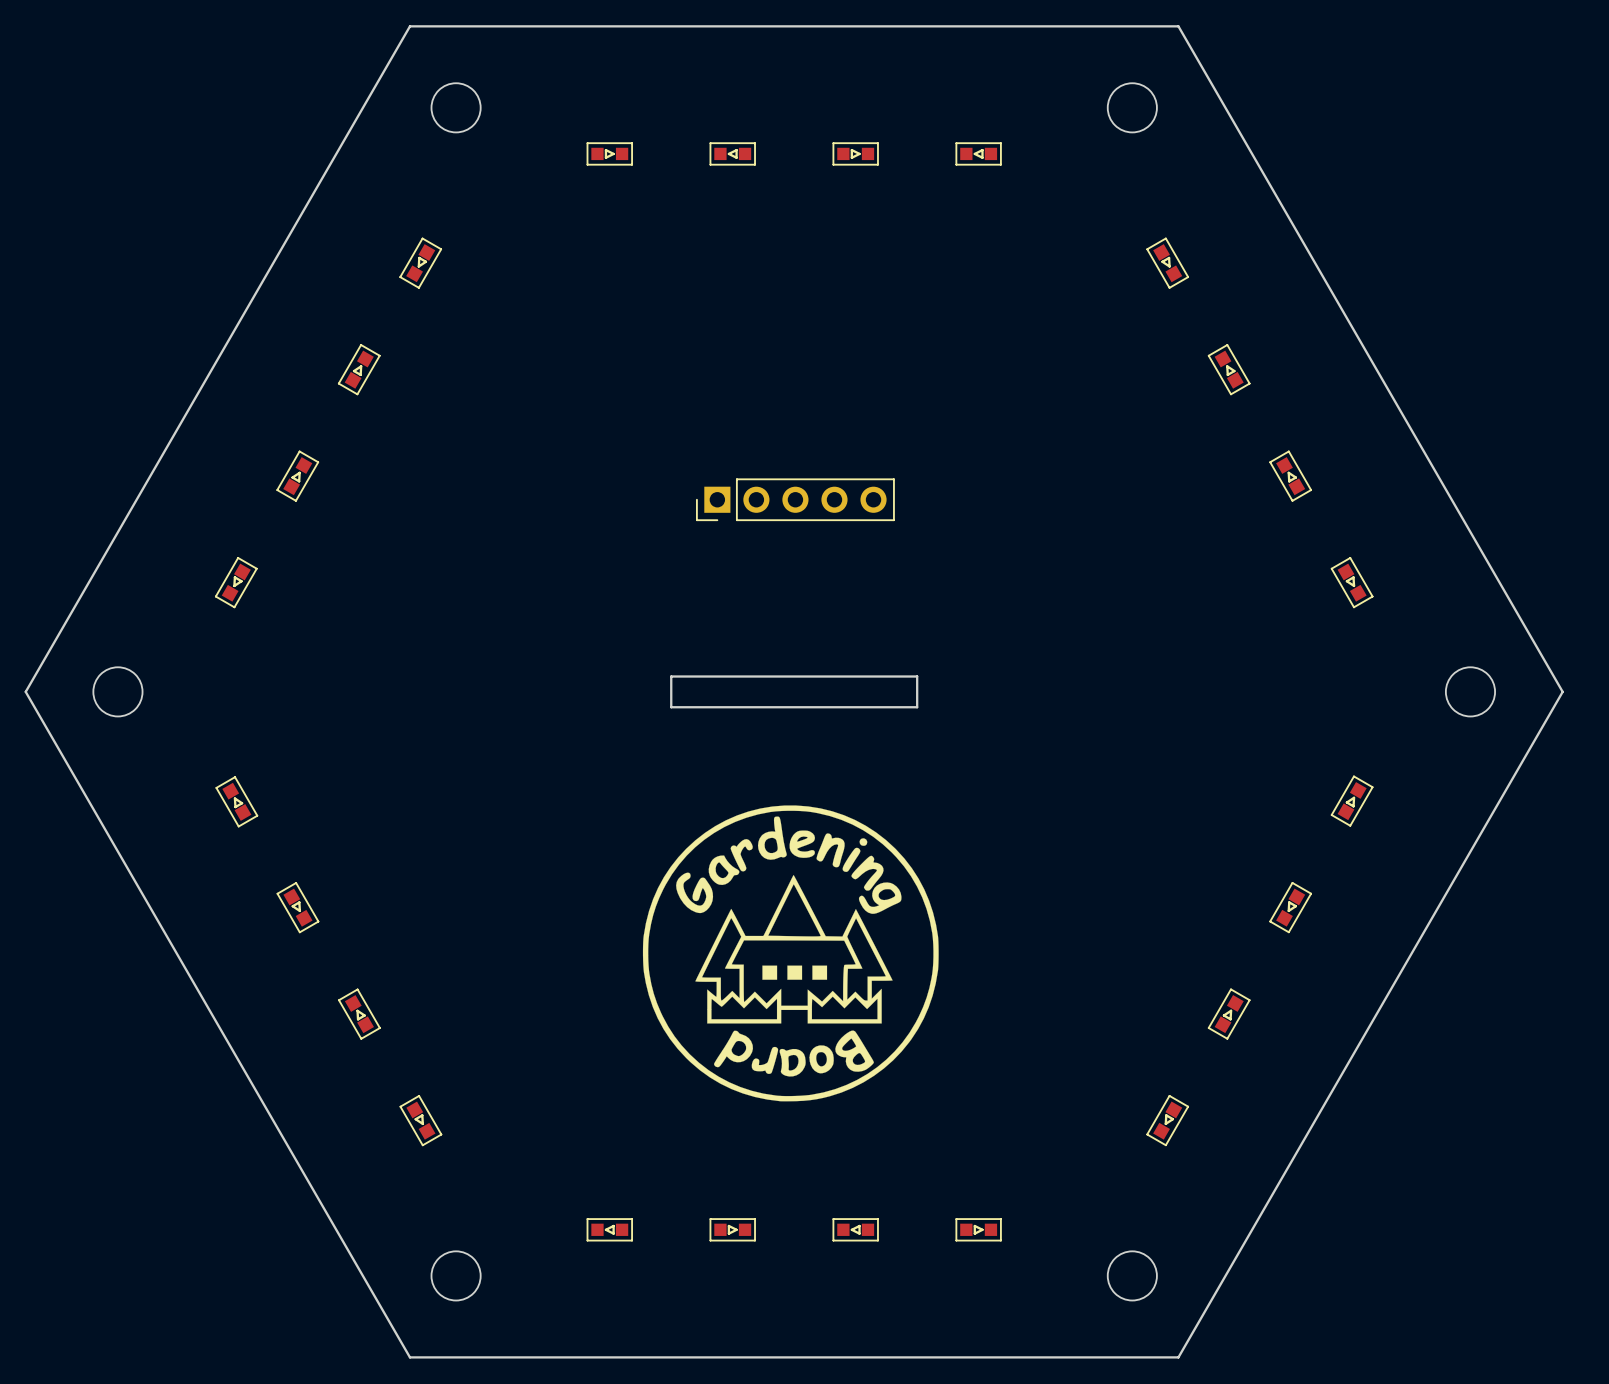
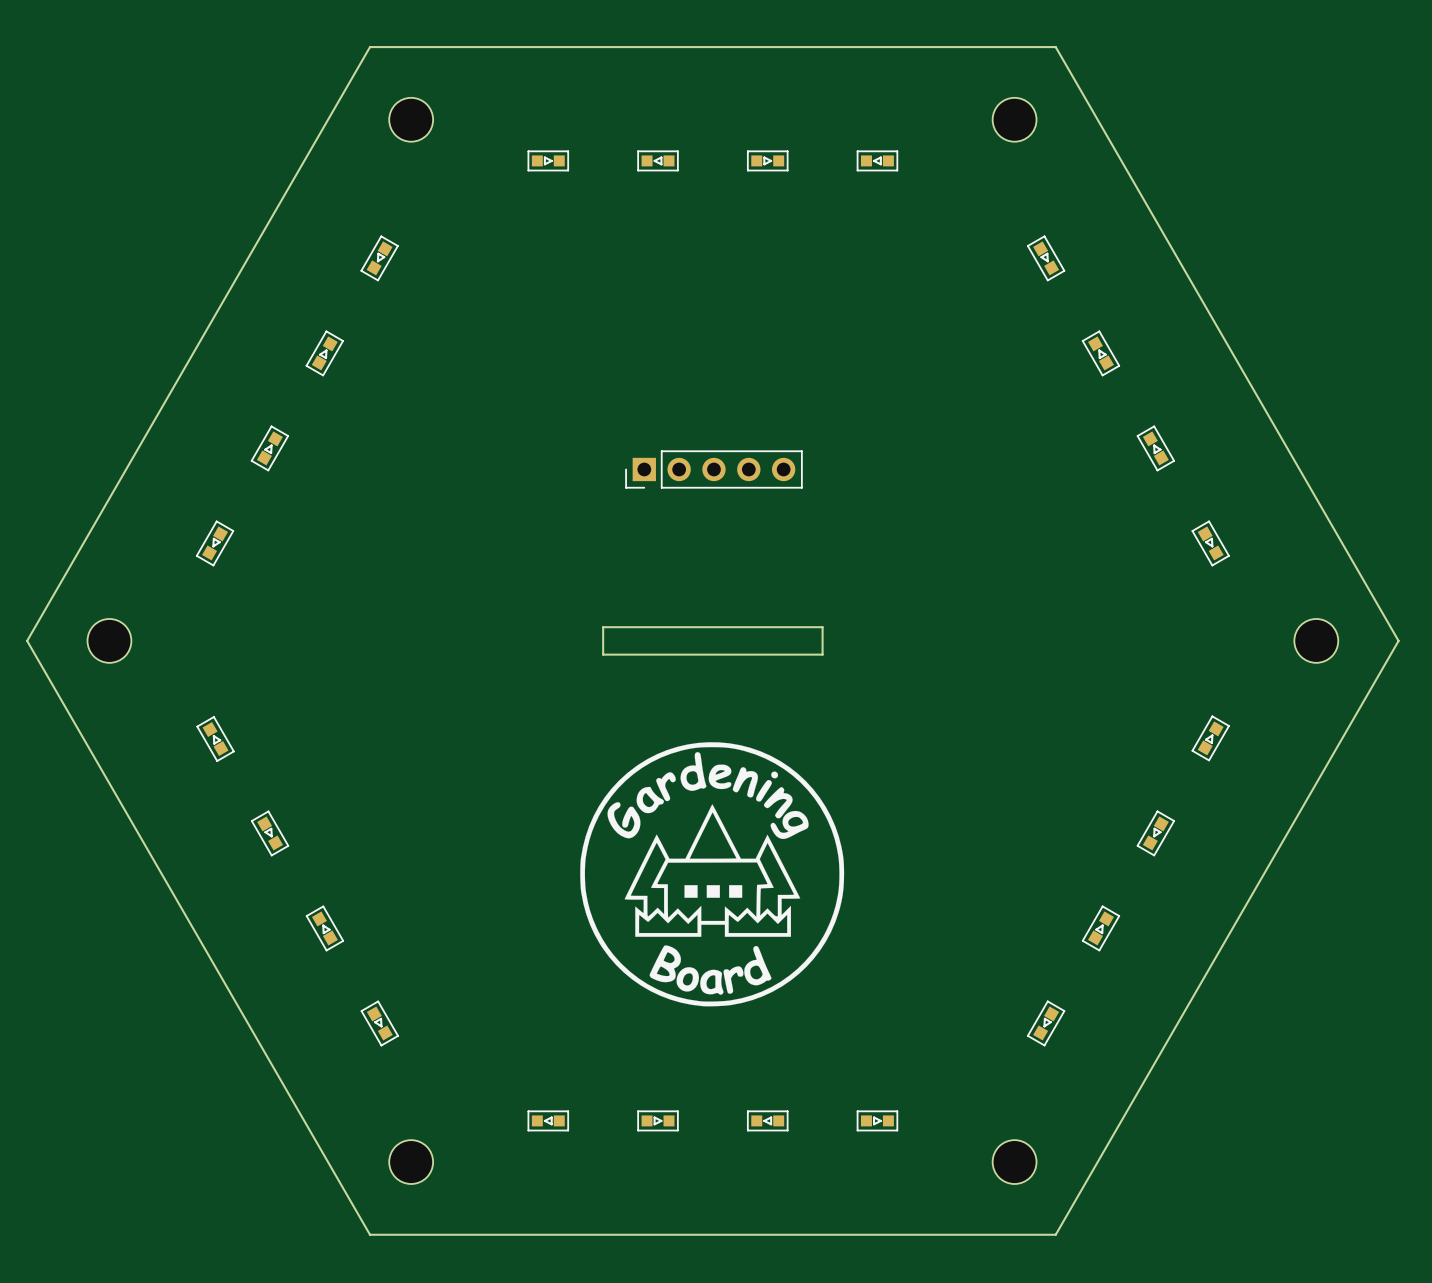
drawing shape: [642, 805, 939, 1102] -> [580, 742, 845, 1007]

